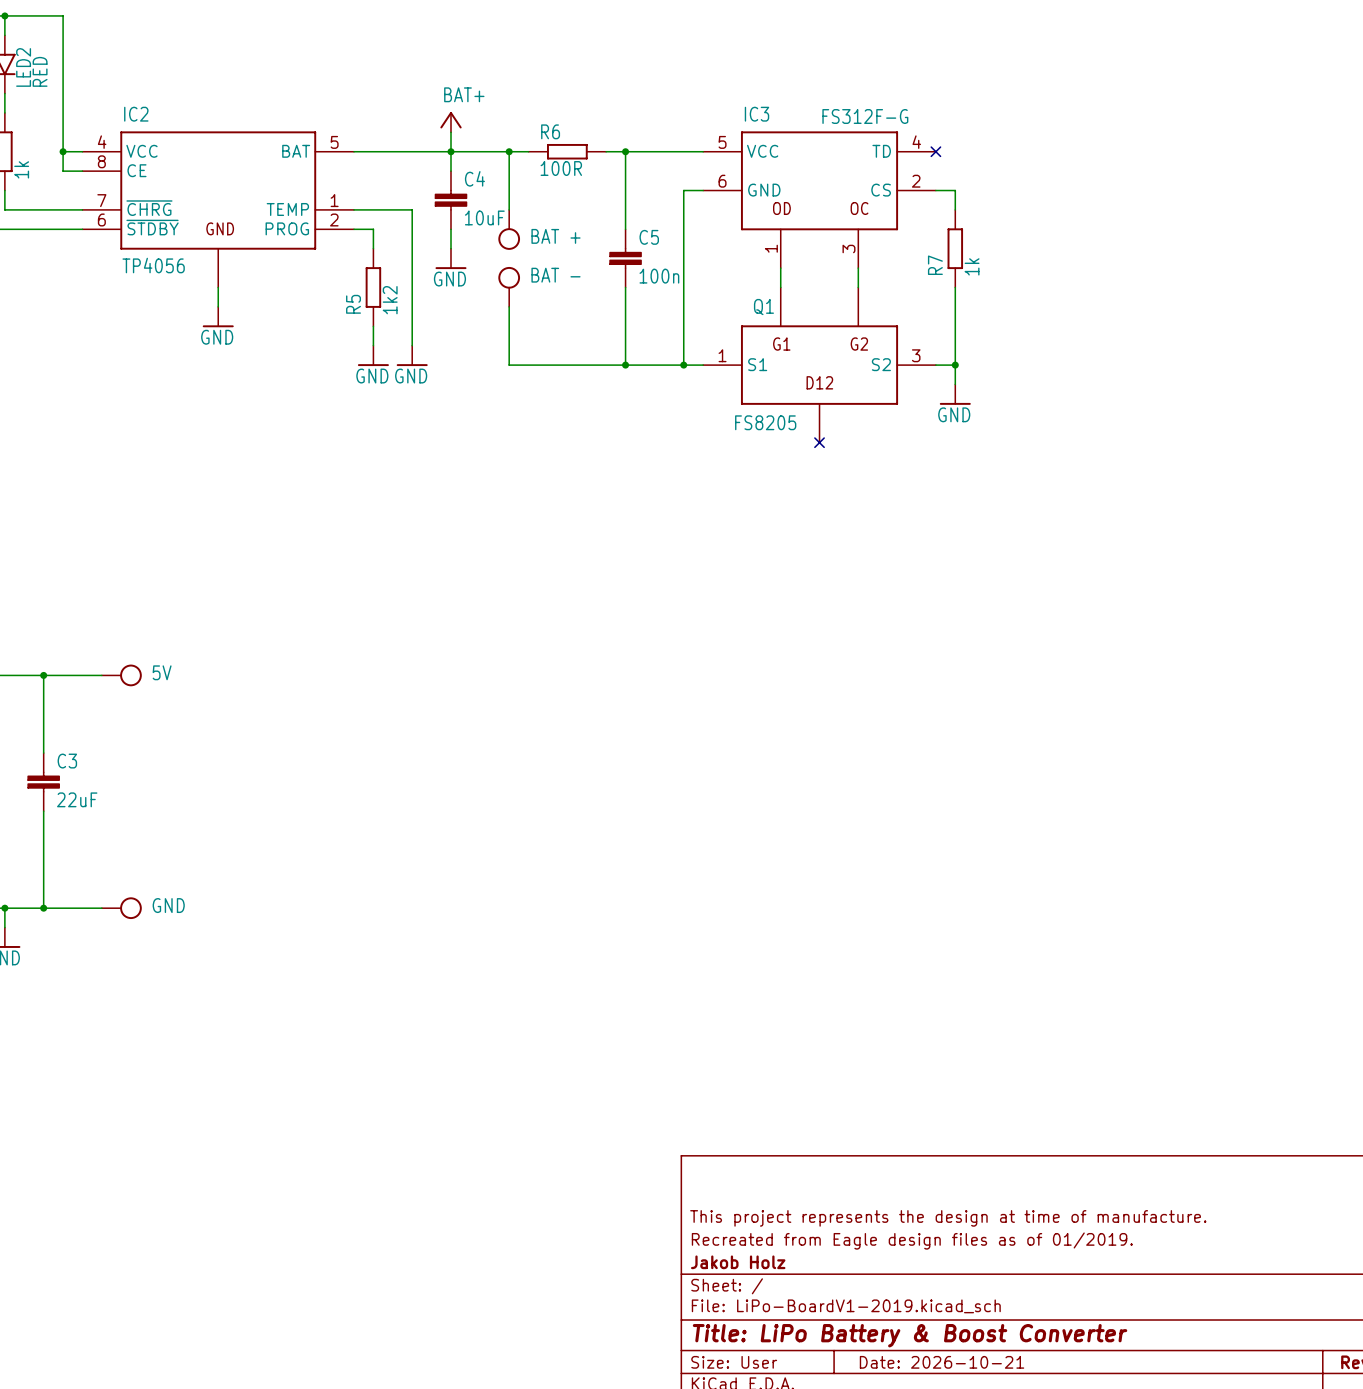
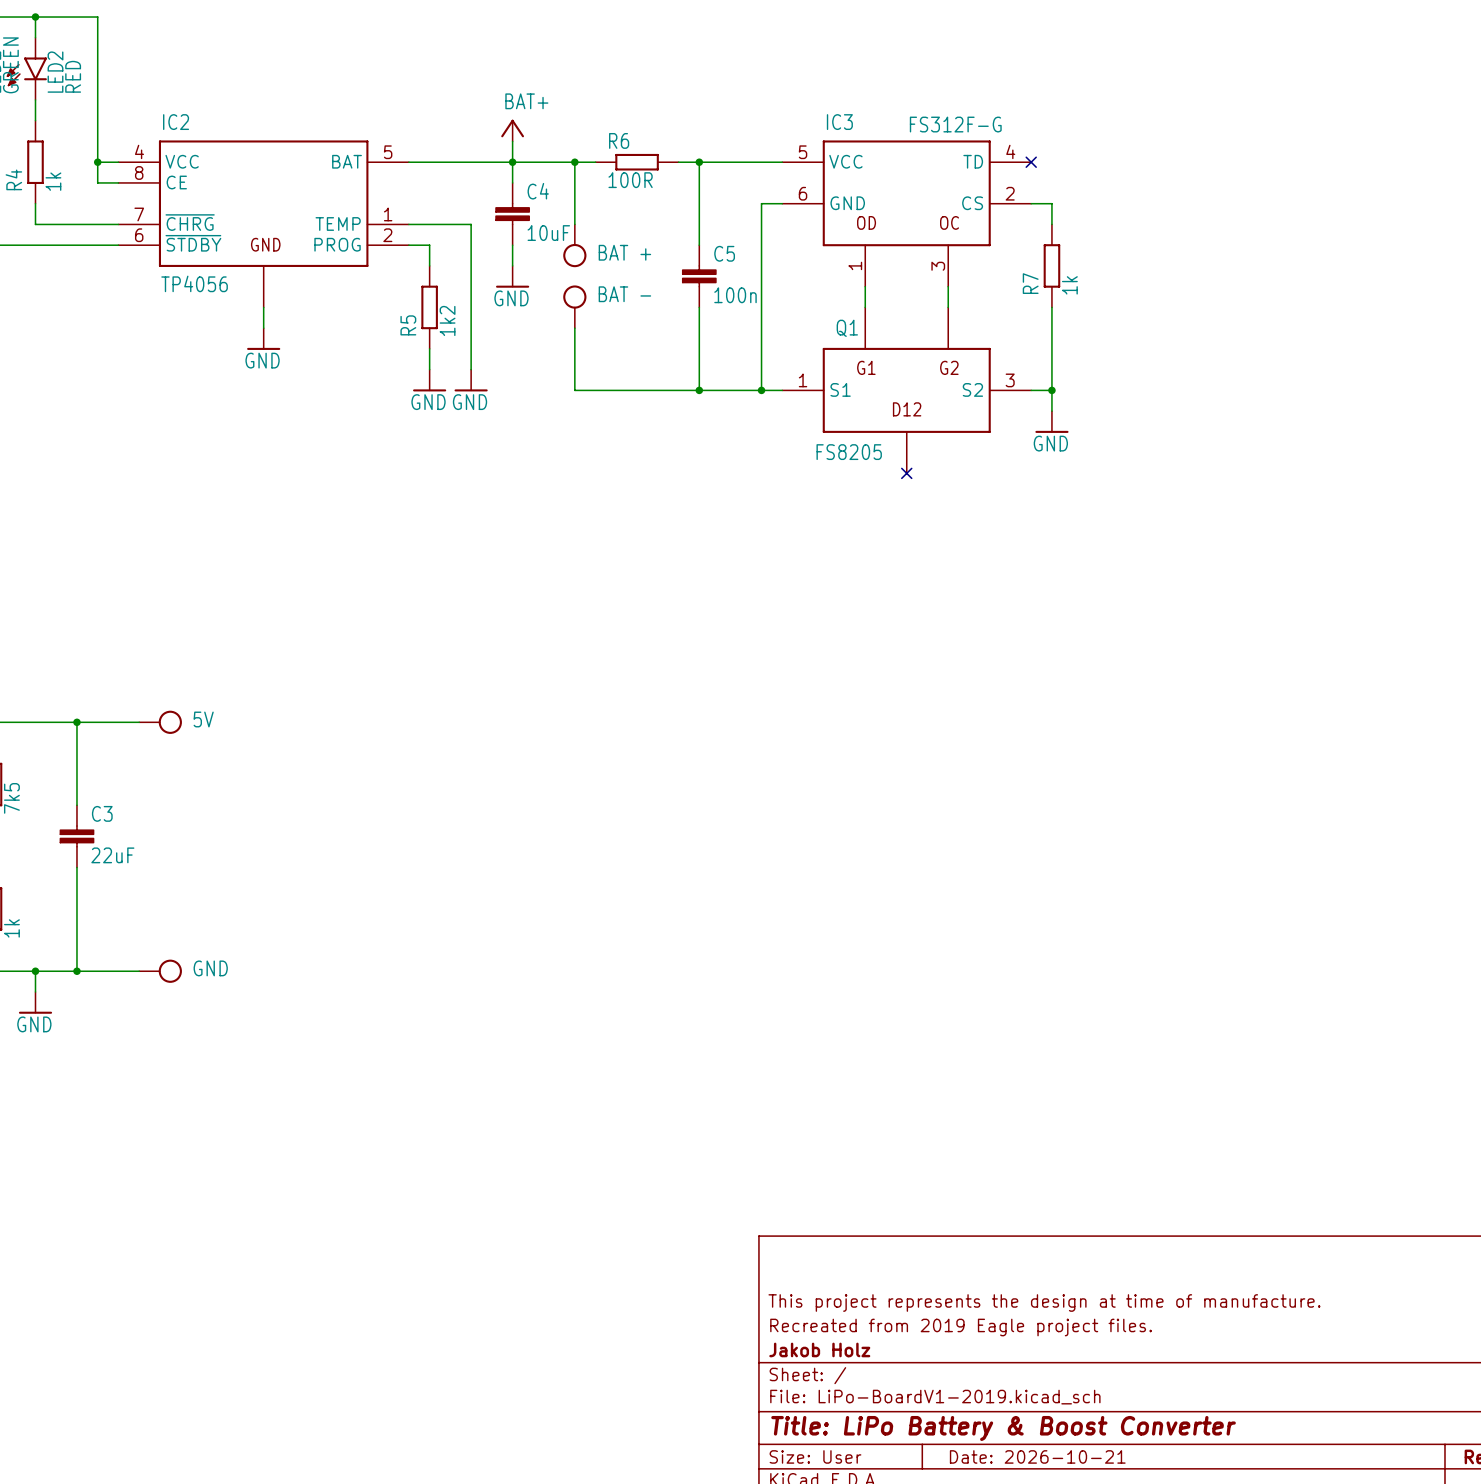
title block: Recreated from Eagle design files as of 01/2019. (912, 1241) -> Recreated from 2019 Eagle project files. (961, 1327)

